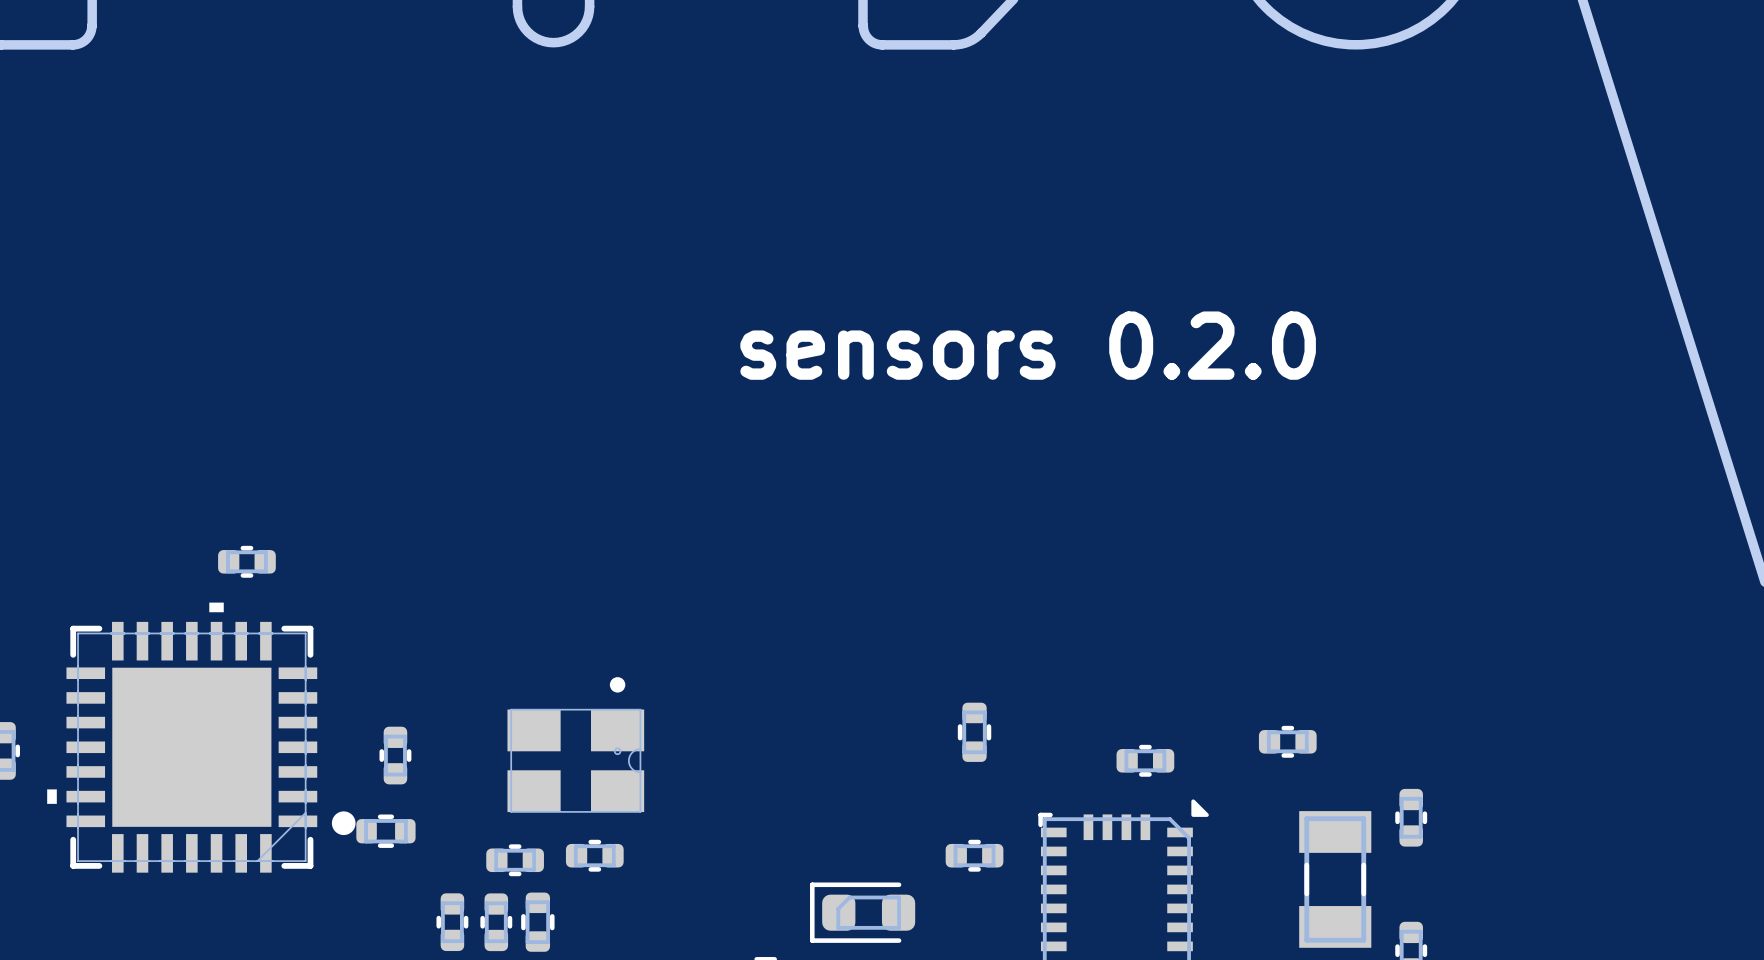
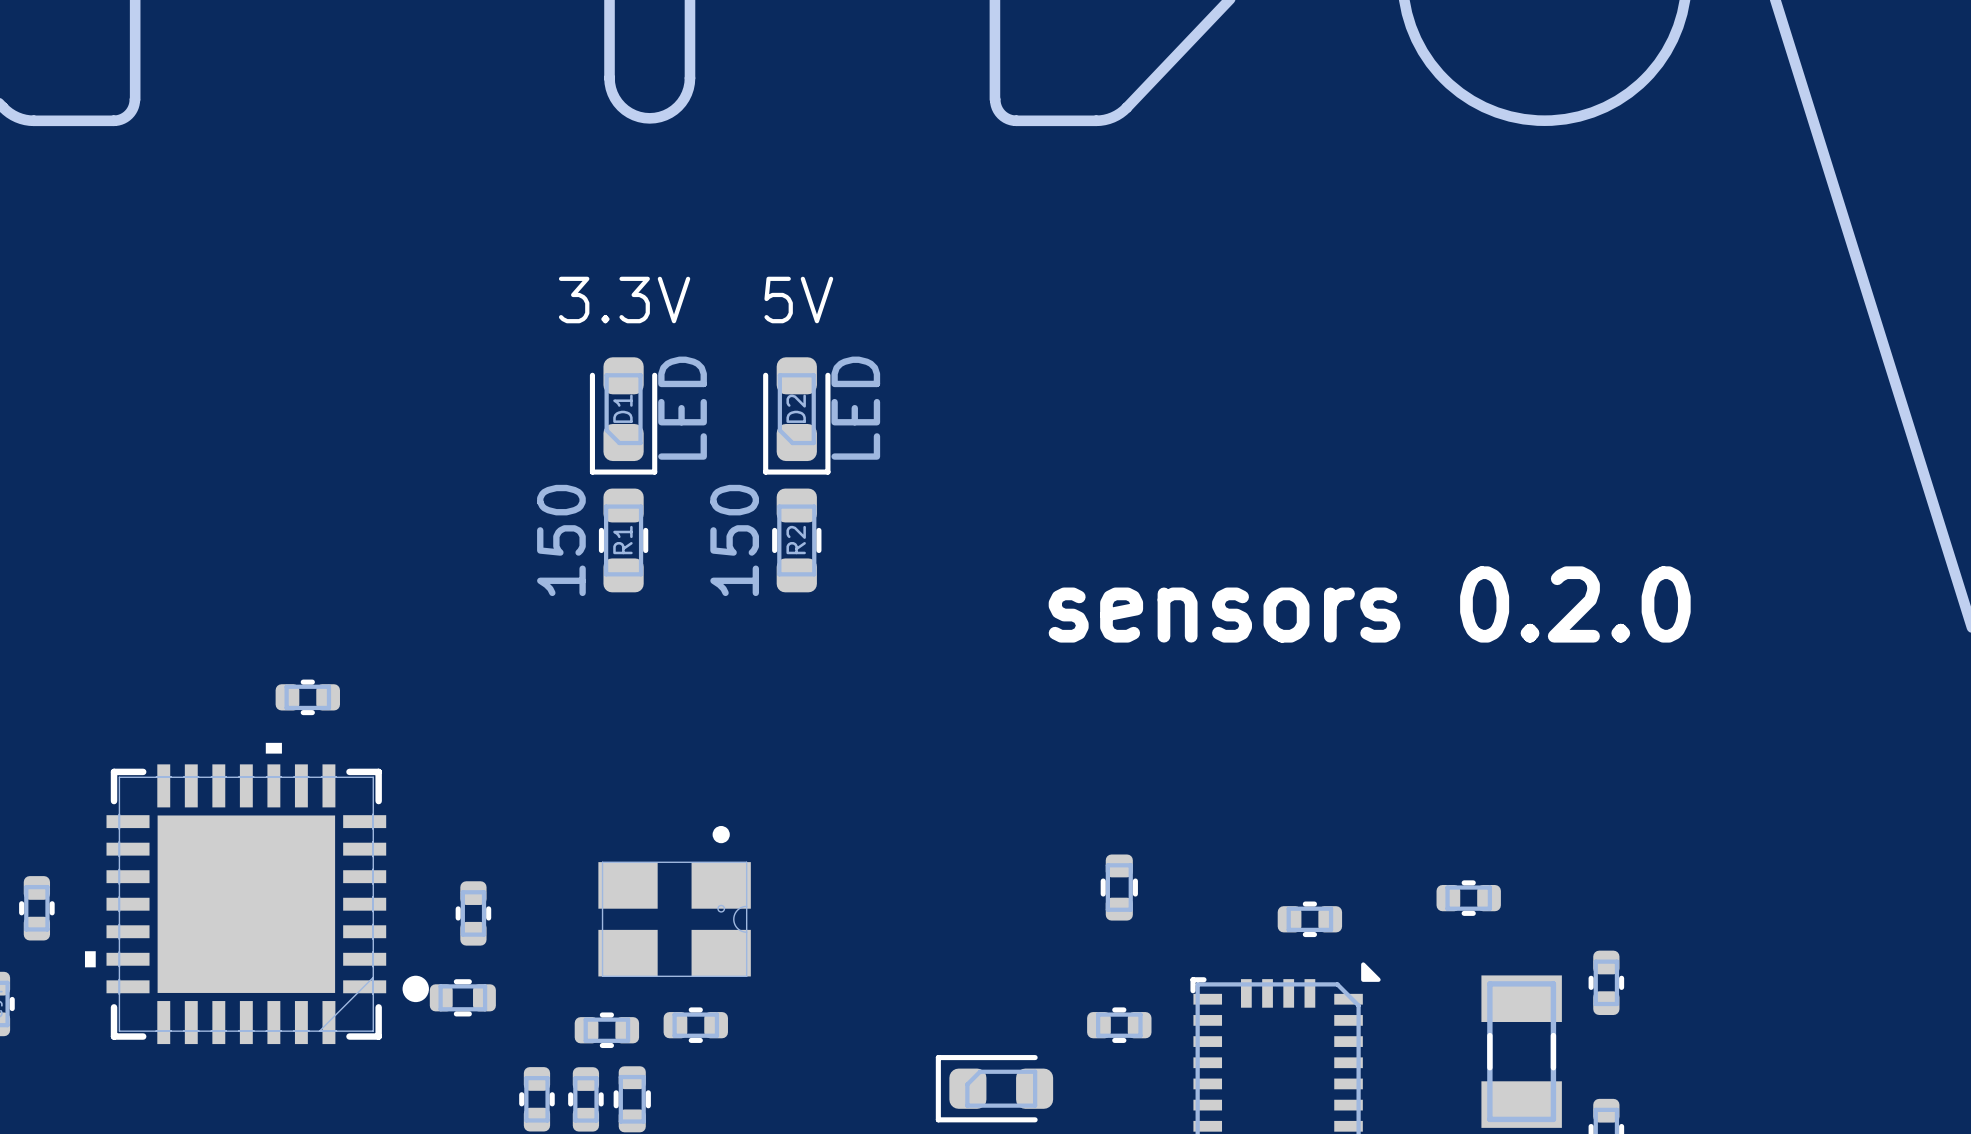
text: none -> 3.3V (624, 300)
text: none -> 5V (798, 300)
D1: none -> LED (623, 415)
D2: none -> LED (796, 415)
text position: sensors 0.2.0 (1028, 345) -> sensors 0.2.0 (1369, 604)
R1: none -> 150 (623, 540)
R2: none -> 150 (796, 540)

